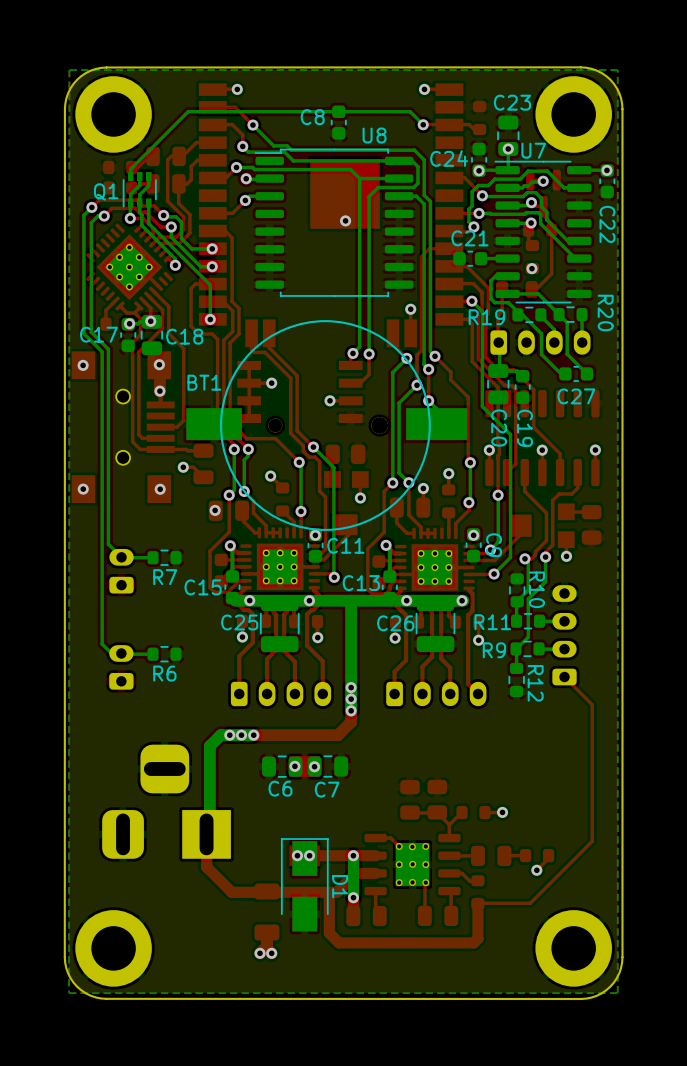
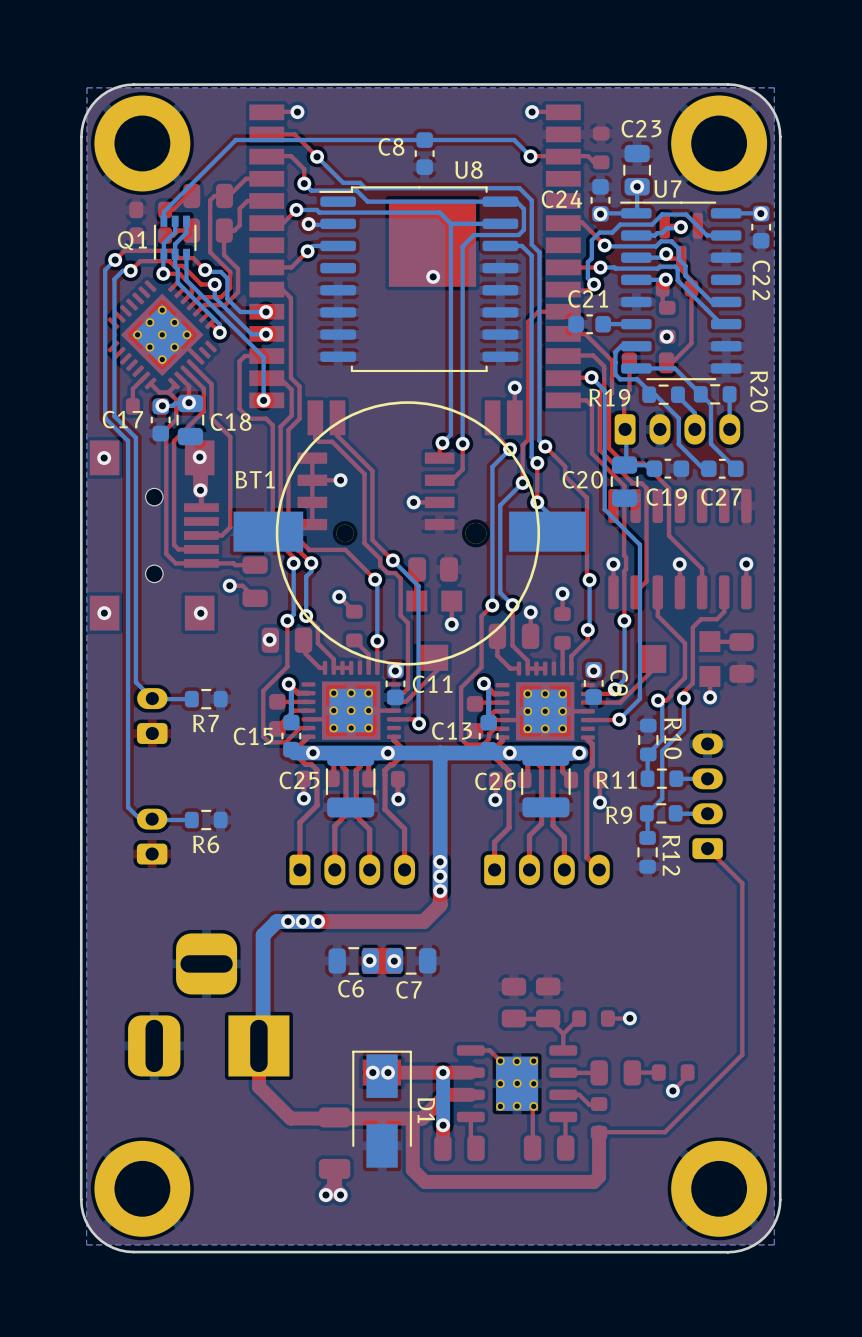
C19 rotation: 0° (522, 387) -> 90° clockwise (667, 468)
C20 name rotation: 0° (499, 428) -> 90° counterclockwise (582, 479)
C20 name position: C20 (499, 428) -> C20 (582, 479)

